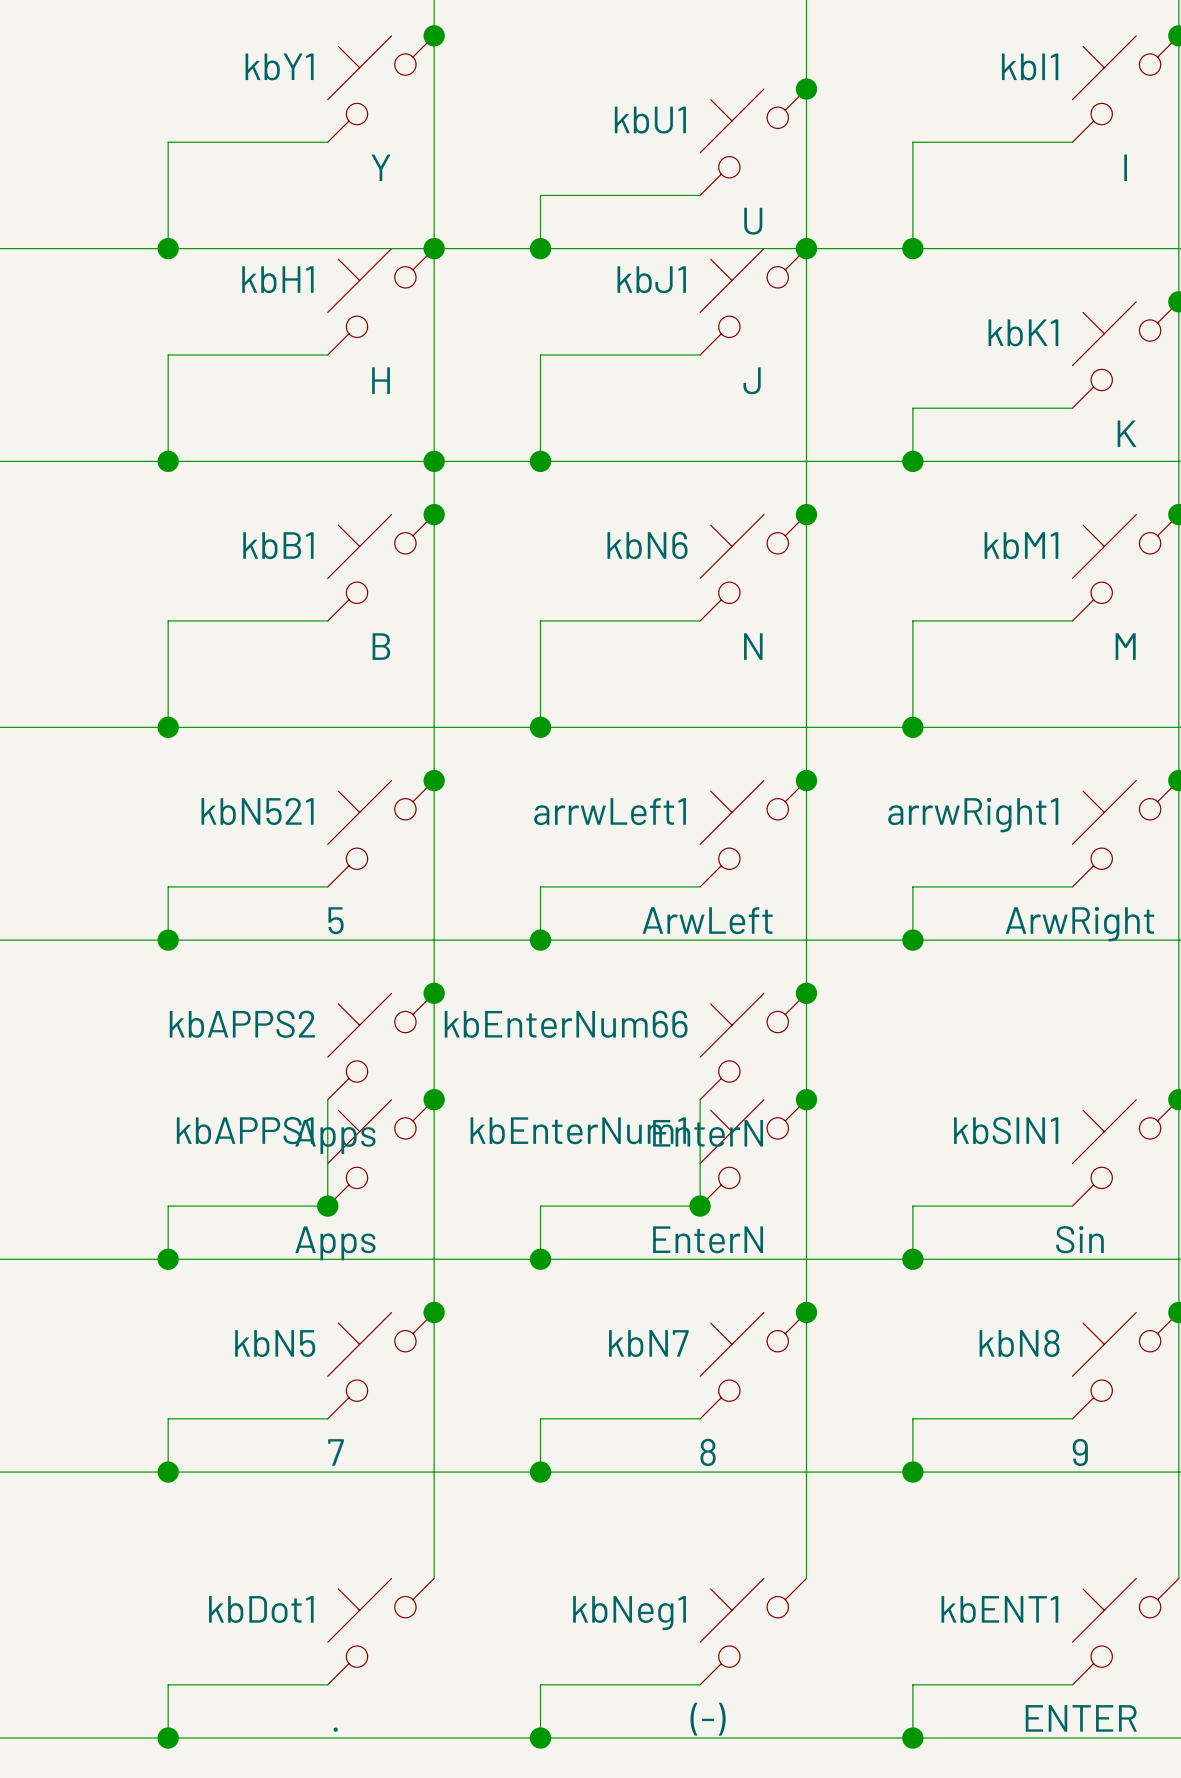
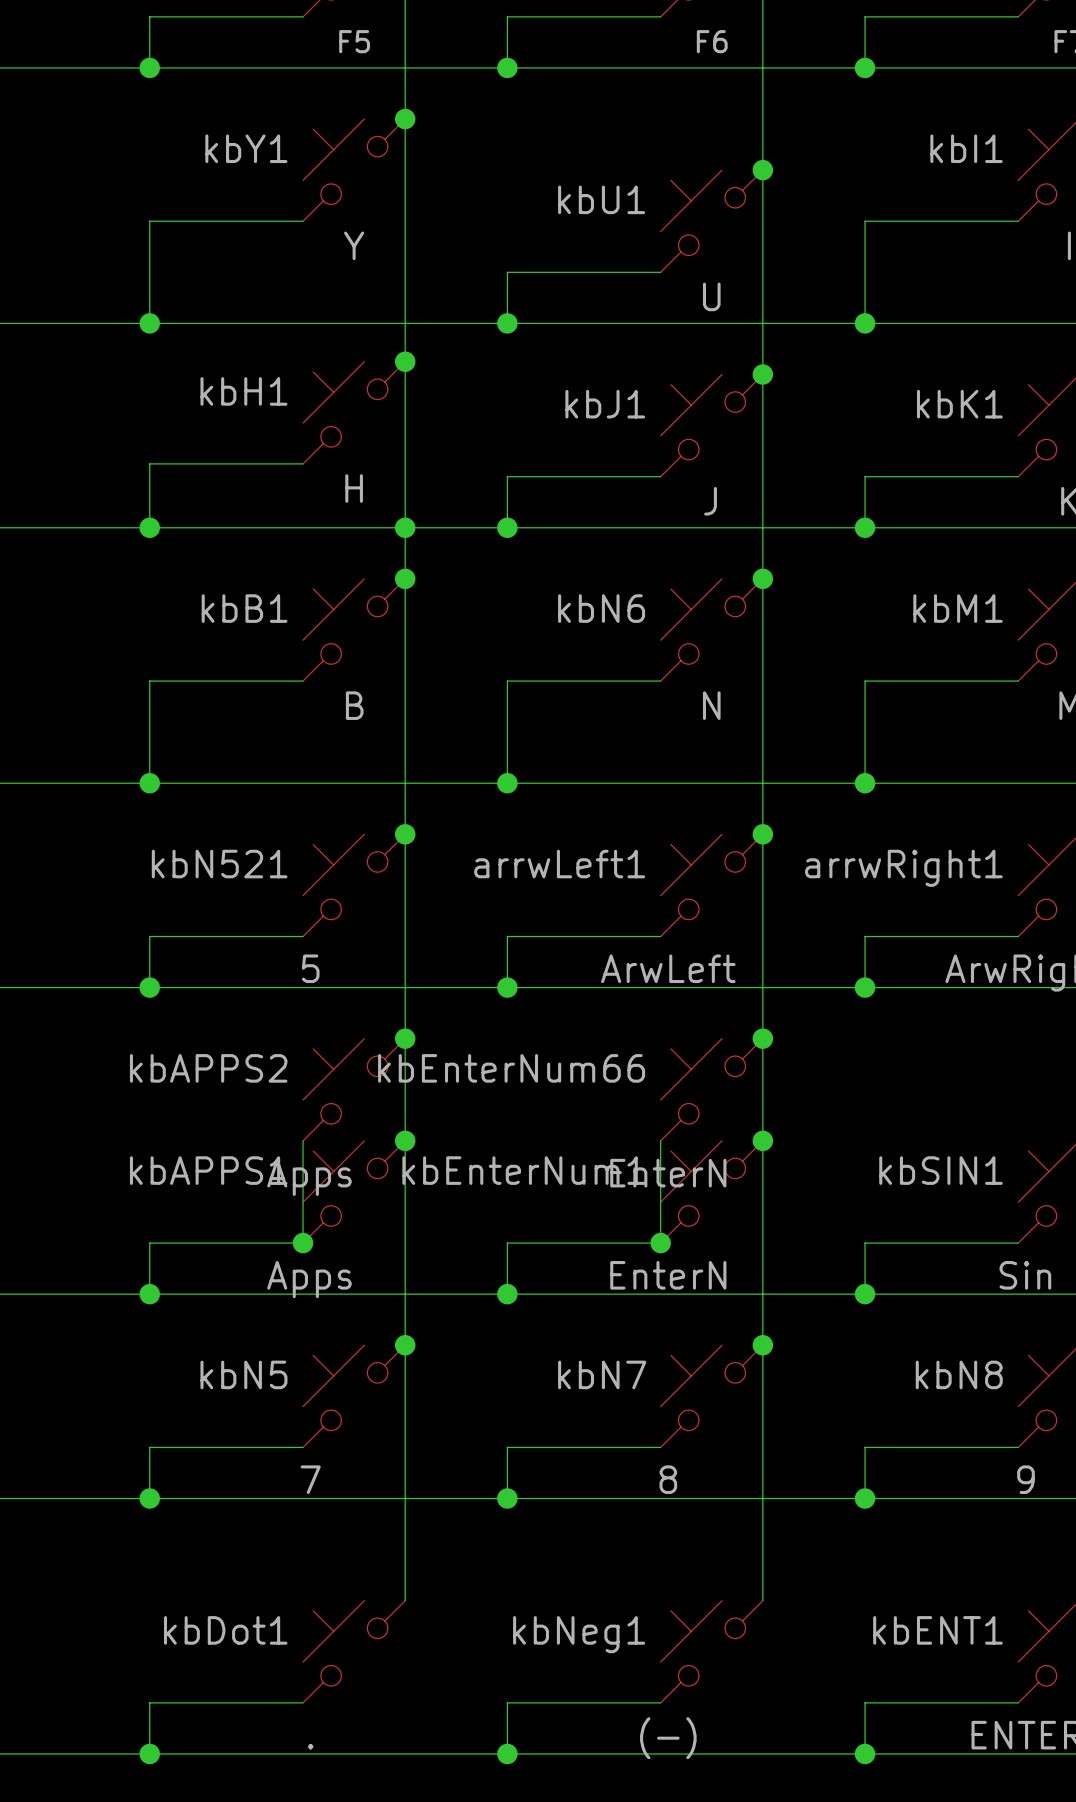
junction position: (434, 248) -> (405, 361)
junction position: (806, 248) -> (762, 374)
kbH1 position: (380, 301) -> (354, 412)
kbJ1 position: (753, 301) -> (711, 425)
wire: (327, 355) (168, 355) (168, 394) -> (303, 463) (149, 463)
wire: (700, 355) (540, 355) (540, 408) -> (660, 476) (507, 476)

